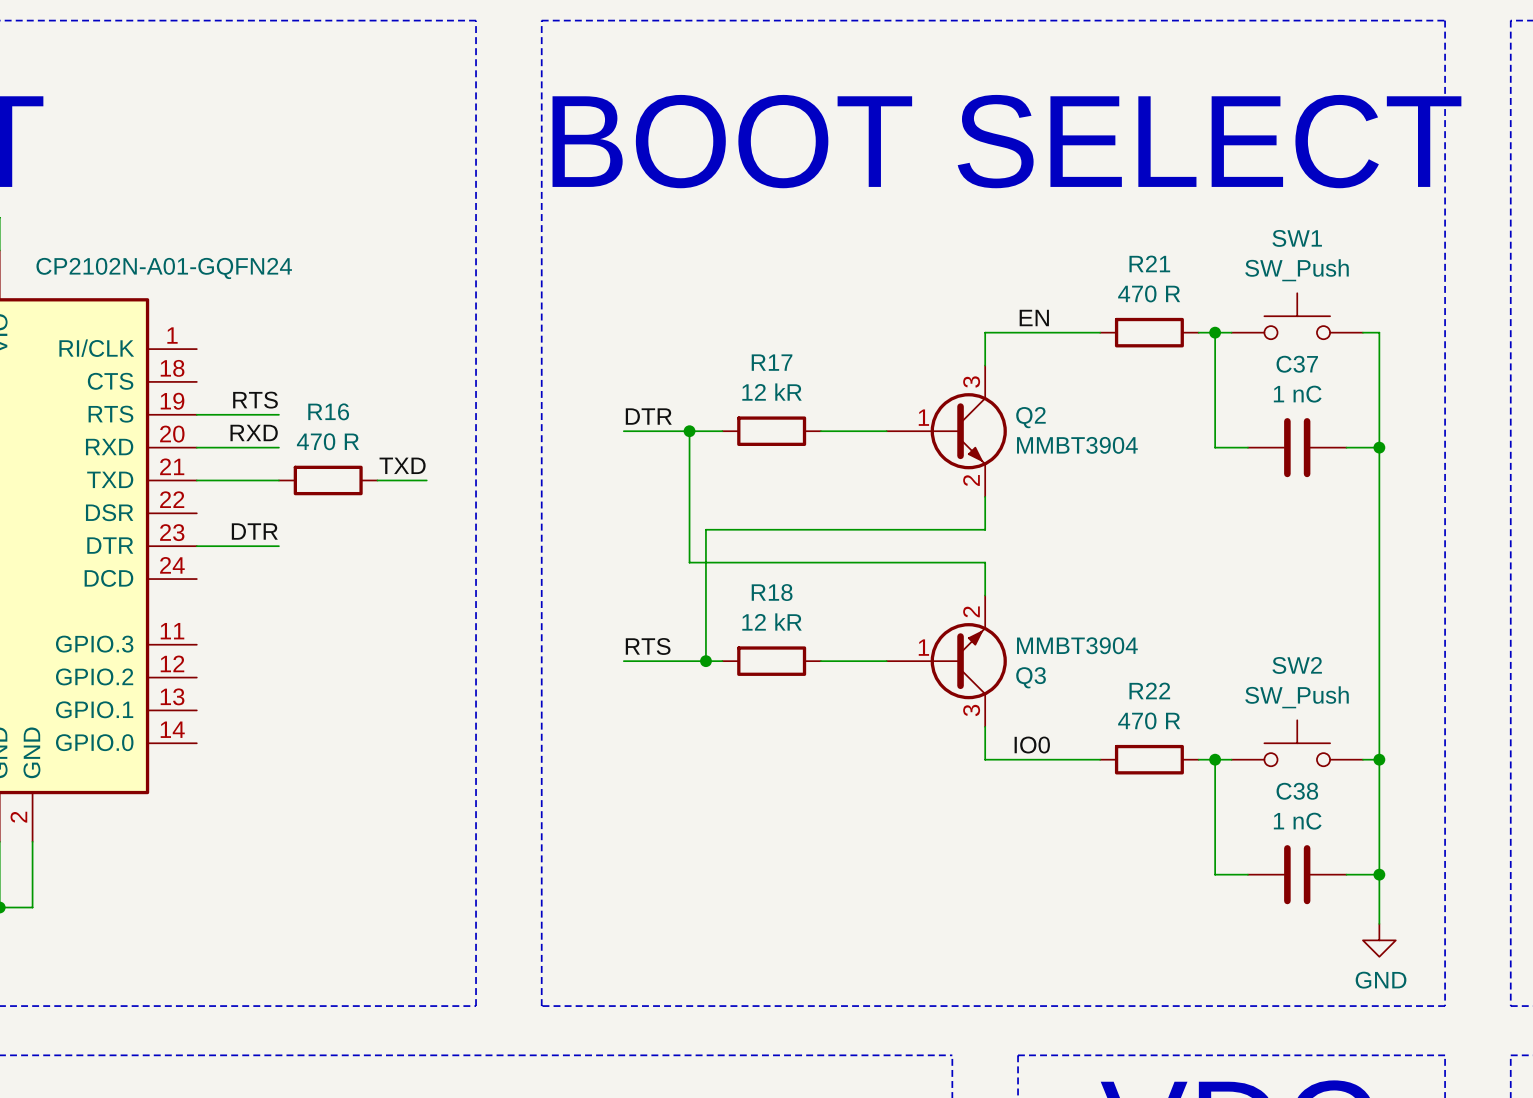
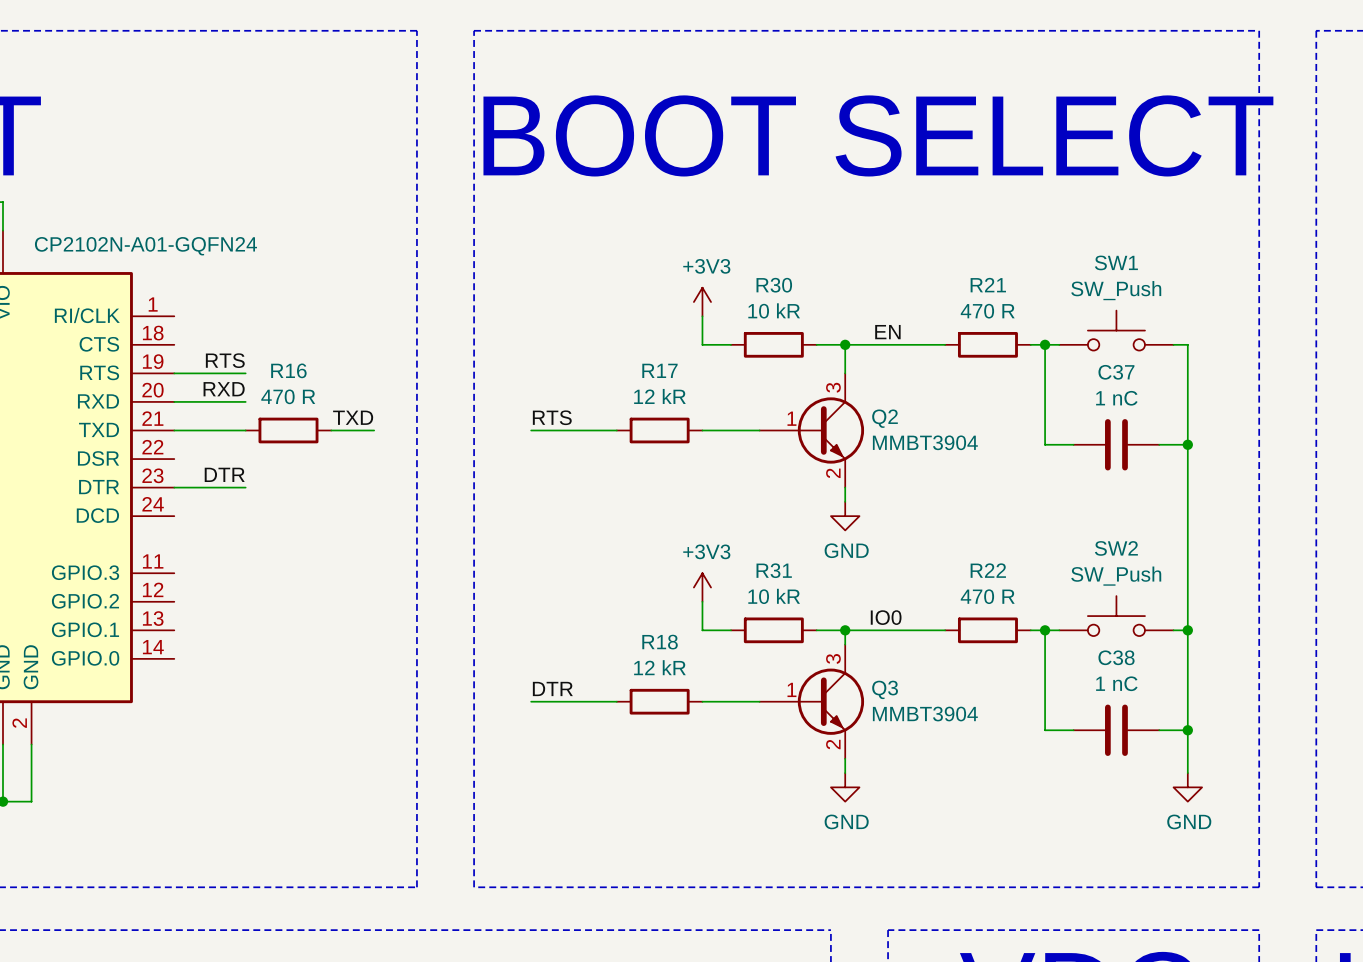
SW1 position: (1297, 316) -> (1116, 330)
label position: EN (1034, 318) -> EN (887, 332)
power symbol: none -> +3V3 (702, 302)
wire: (1100, 332) (985, 332) (985, 365) -> none
R21 position: (1149, 332) -> (987, 344)
wire: (1198, 332) (1231, 332) -> (1030, 344) (1059, 344)
wire: (1215, 332) (1215, 447) (1247, 447) -> (1045, 344) (1045, 444) (1073, 444)
junction position: (1215, 332) -> (1045, 344)
wire: (1362, 332) (1379, 332) (1379, 923) -> none
wire: none -> (702, 316) (702, 344) (731, 344)
R30: none -> 10 kR (773, 344)
wire: none -> (816, 344) (945, 344)
wire: none -> (845, 344) (845, 373)
junction: none -> (845, 344)
wire: none -> (1173, 344) (1187, 344) (1187, 773)
label: DTR (648, 416) -> none
wire: (623, 431) (722, 431) -> (531, 430) (616, 430)
wire: (689, 431) (689, 562) (985, 562) (985, 595) -> none
junction: (689, 431) -> none
R17 position: (771, 431) -> (659, 430)
wire: (820, 431) (886, 431) -> (702, 430) (759, 430)
Q2 position: (946, 431) -> (811, 430)
C37 position: (1297, 447) -> (1116, 444)
wire: (1346, 447) (1379, 447) -> (1159, 444) (1187, 444)
junction position: (1379, 447) -> (1187, 444)
wire: (985, 496) (985, 529) (705, 529) (705, 661) -> none
wire: none -> (845, 487) (845, 501)
power symbol: none -> GND (845, 516)
label position: RTS (648, 646) -> RTS (552, 417)
wire: (623, 661) (722, 661) -> (531, 701) (616, 701)
junction: (705, 661) -> none
R18 position: (771, 661) -> (659, 701)
power symbol: none -> +3V3 (702, 587)
wire: (820, 661) (886, 661) -> (702, 701) (759, 701)
Q3 position: (946, 661) -> (811, 701)
Q3 flip: as is (968, 661) -> up-down (830, 701)
wire: none -> (702, 601) (702, 630) (731, 630)
R31: none -> 10 kR (773, 630)
wire: none -> (816, 630) (945, 630)
wire: none -> (845, 630) (845, 644)
junction: none -> (845, 630)
junction: none -> (1187, 630)
wire: (985, 726) (985, 759) (1100, 759) -> none
SW2 position: (1297, 743) -> (1116, 616)
label position: IO0 (1032, 745) -> IO0 (886, 617)
R22 position: (1149, 759) -> (987, 630)
wire: (1198, 759) (1231, 759) -> (1030, 630) (1059, 630)
wire: (1215, 759) (1215, 874) (1247, 874) -> (1045, 630) (1045, 730) (1073, 730)
junction position: (1215, 759) -> (1045, 630)
wire: (1362, 759) (1379, 759) -> (1173, 630) (1187, 630)
junction: (1379, 759) -> none
label: none -> DTR (552, 688)
junction: none -> (1187, 730)
wire: none -> (845, 758) (845, 773)
C38 position: (1297, 874) -> (1116, 730)
wire: (1346, 874) (1379, 874) -> (1159, 730) (1187, 730)
junction: (1379, 874) -> none
power symbol: none -> GND (845, 787)
power symbol position: GND (1379, 940) -> GND (1187, 787)

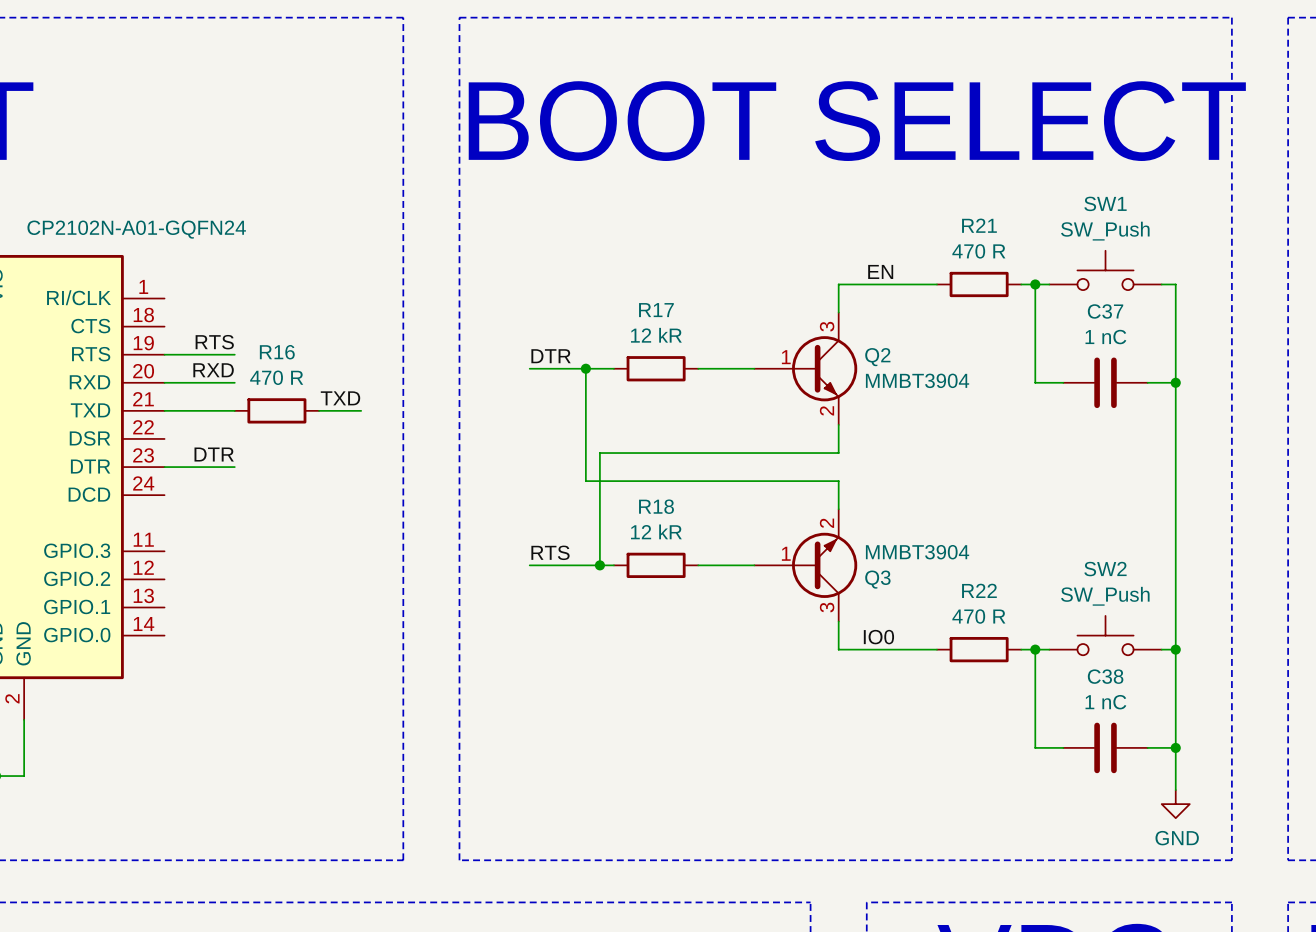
power symbol: +3V3 (702, 302) -> none
wire: none -> (936, 284) (838, 284) (838, 312)
wire: none -> (1161, 284) (1175, 284) (1175, 790)
wire: (702, 316) (702, 344) (731, 344) -> none
SW1 position: (1116, 330) -> (1105, 270)
label position: EN (887, 332) -> EN (880, 271)
R30: 10 kR (773, 344) -> none
wire: (816, 344) (945, 344) -> none
wire: (845, 344) (845, 373) -> none
junction: (845, 344) -> none
R21 position: (987, 344) -> (979, 284)
wire: (1030, 344) (1059, 344) -> (1021, 284) (1049, 284)
wire: (1045, 344) (1045, 444) (1073, 444) -> (1035, 284) (1035, 382) (1063, 382)
junction position: (1045, 344) -> (1035, 284)
wire: (1173, 344) (1187, 344) (1187, 773) -> none
label: none -> DTR (551, 356)
wire: none -> (585, 368) (585, 481) (838, 481) (838, 509)
junction: none -> (585, 368)
label position: RTS (552, 417) -> RTS (550, 552)
wire: (531, 430) (616, 430) -> (529, 368) (613, 368)
R17 position: (659, 430) -> (656, 368)
wire: (702, 430) (759, 430) -> (698, 368) (754, 368)
Q2 position: (811, 430) -> (805, 368)
wire: none -> (838, 424) (838, 453) (599, 453) (599, 565)
C37 position: (1116, 444) -> (1105, 382)
wire: (1159, 444) (1187, 444) -> (1147, 382) (1175, 382)
junction position: (1187, 444) -> (1175, 382)
wire: (845, 487) (845, 501) -> none
power symbol: GND (845, 516) -> none
junction: none -> (599, 565)
power symbol: +3V3 (702, 587) -> none
wire: (702, 601) (702, 630) (731, 630) -> none
SW2 position: (1116, 616) -> (1105, 635)
label position: IO0 (886, 617) -> IO0 (878, 637)
R31: 10 kR (773, 630) -> none
wire: (816, 630) (945, 630) -> none
wire: (845, 630) (845, 644) -> none
junction: (845, 630) -> none
R22 position: (987, 630) -> (979, 649)
wire: (1030, 630) (1059, 630) -> (1021, 649) (1049, 649)
wire: (1045, 630) (1045, 730) (1073, 730) -> (1035, 649) (1035, 747) (1063, 747)
junction position: (1045, 630) -> (1035, 649)
wire: (1173, 630) (1187, 630) -> (1161, 649) (1175, 649)
junction: (1187, 630) -> none
wire: none -> (838, 621) (838, 649) (936, 649)
junction: none -> (1175, 649)
label: DTR (552, 688) -> none
wire: (531, 701) (616, 701) -> (529, 565) (613, 565)
R18 position: (659, 701) -> (656, 565)
wire: (702, 701) (759, 701) -> (698, 565) (754, 565)
Q3 position: (811, 701) -> (805, 565)
Q3 flip: as is (830, 701) -> up-down (824, 565)
C38 position: (1116, 730) -> (1105, 747)
wire: (1159, 730) (1187, 730) -> (1147, 747) (1175, 747)
junction: (1187, 730) -> none
wire: (845, 758) (845, 773) -> none
junction: none -> (1175, 747)
power symbol: GND (845, 787) -> none
power symbol position: GND (1187, 787) -> GND (1175, 804)

